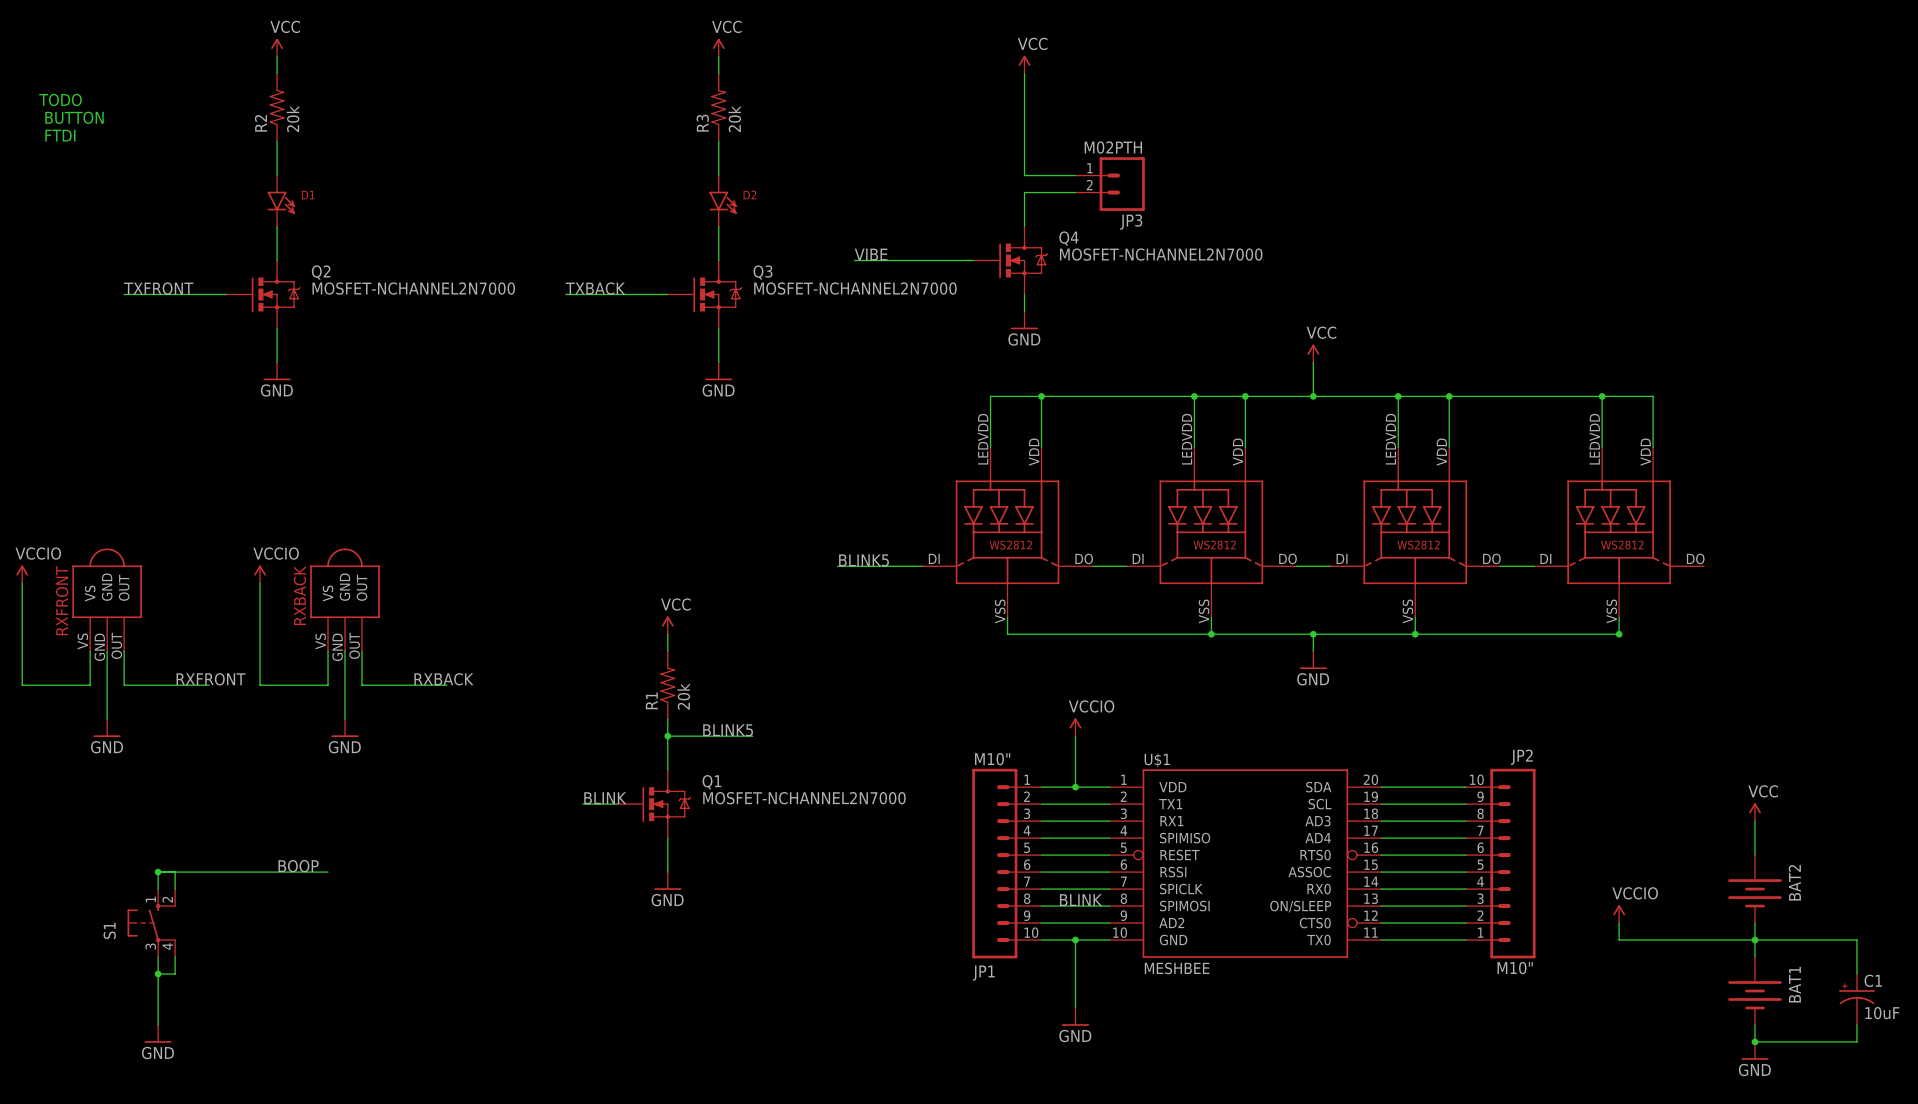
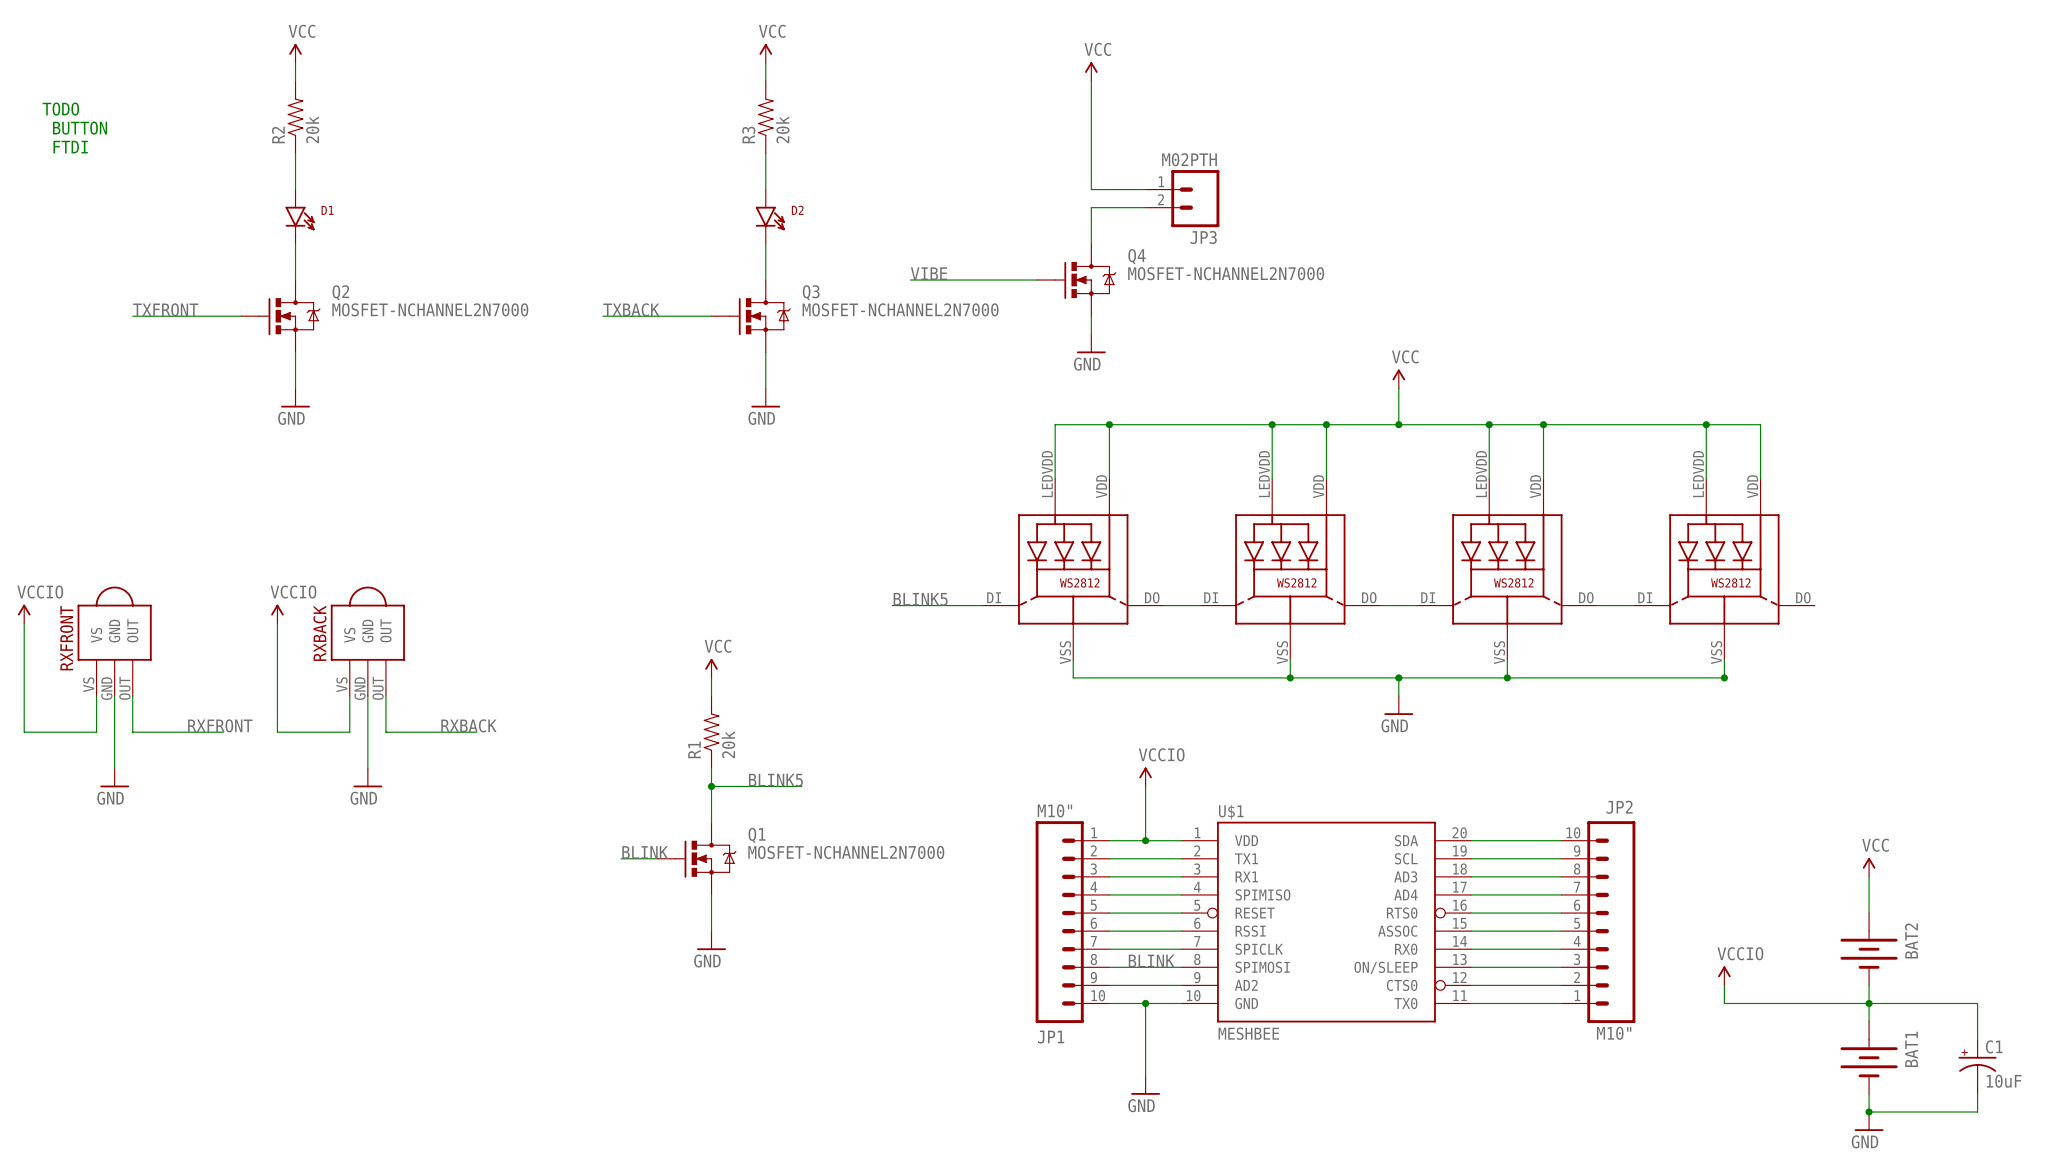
label: BOOP (298, 866) -> none
junction: (158, 872) -> none
wire: (175, 872) (175, 889) -> none
wire: (328, 872) (158, 872) (158, 889) -> none
S1: (151, 923) -> none
wire: (158, 957) (158, 1024) -> none
wire: (175, 957) (175, 974) (158, 974) -> none
junction: (158, 974) -> none
power symbol: GND (158, 1033) -> none

